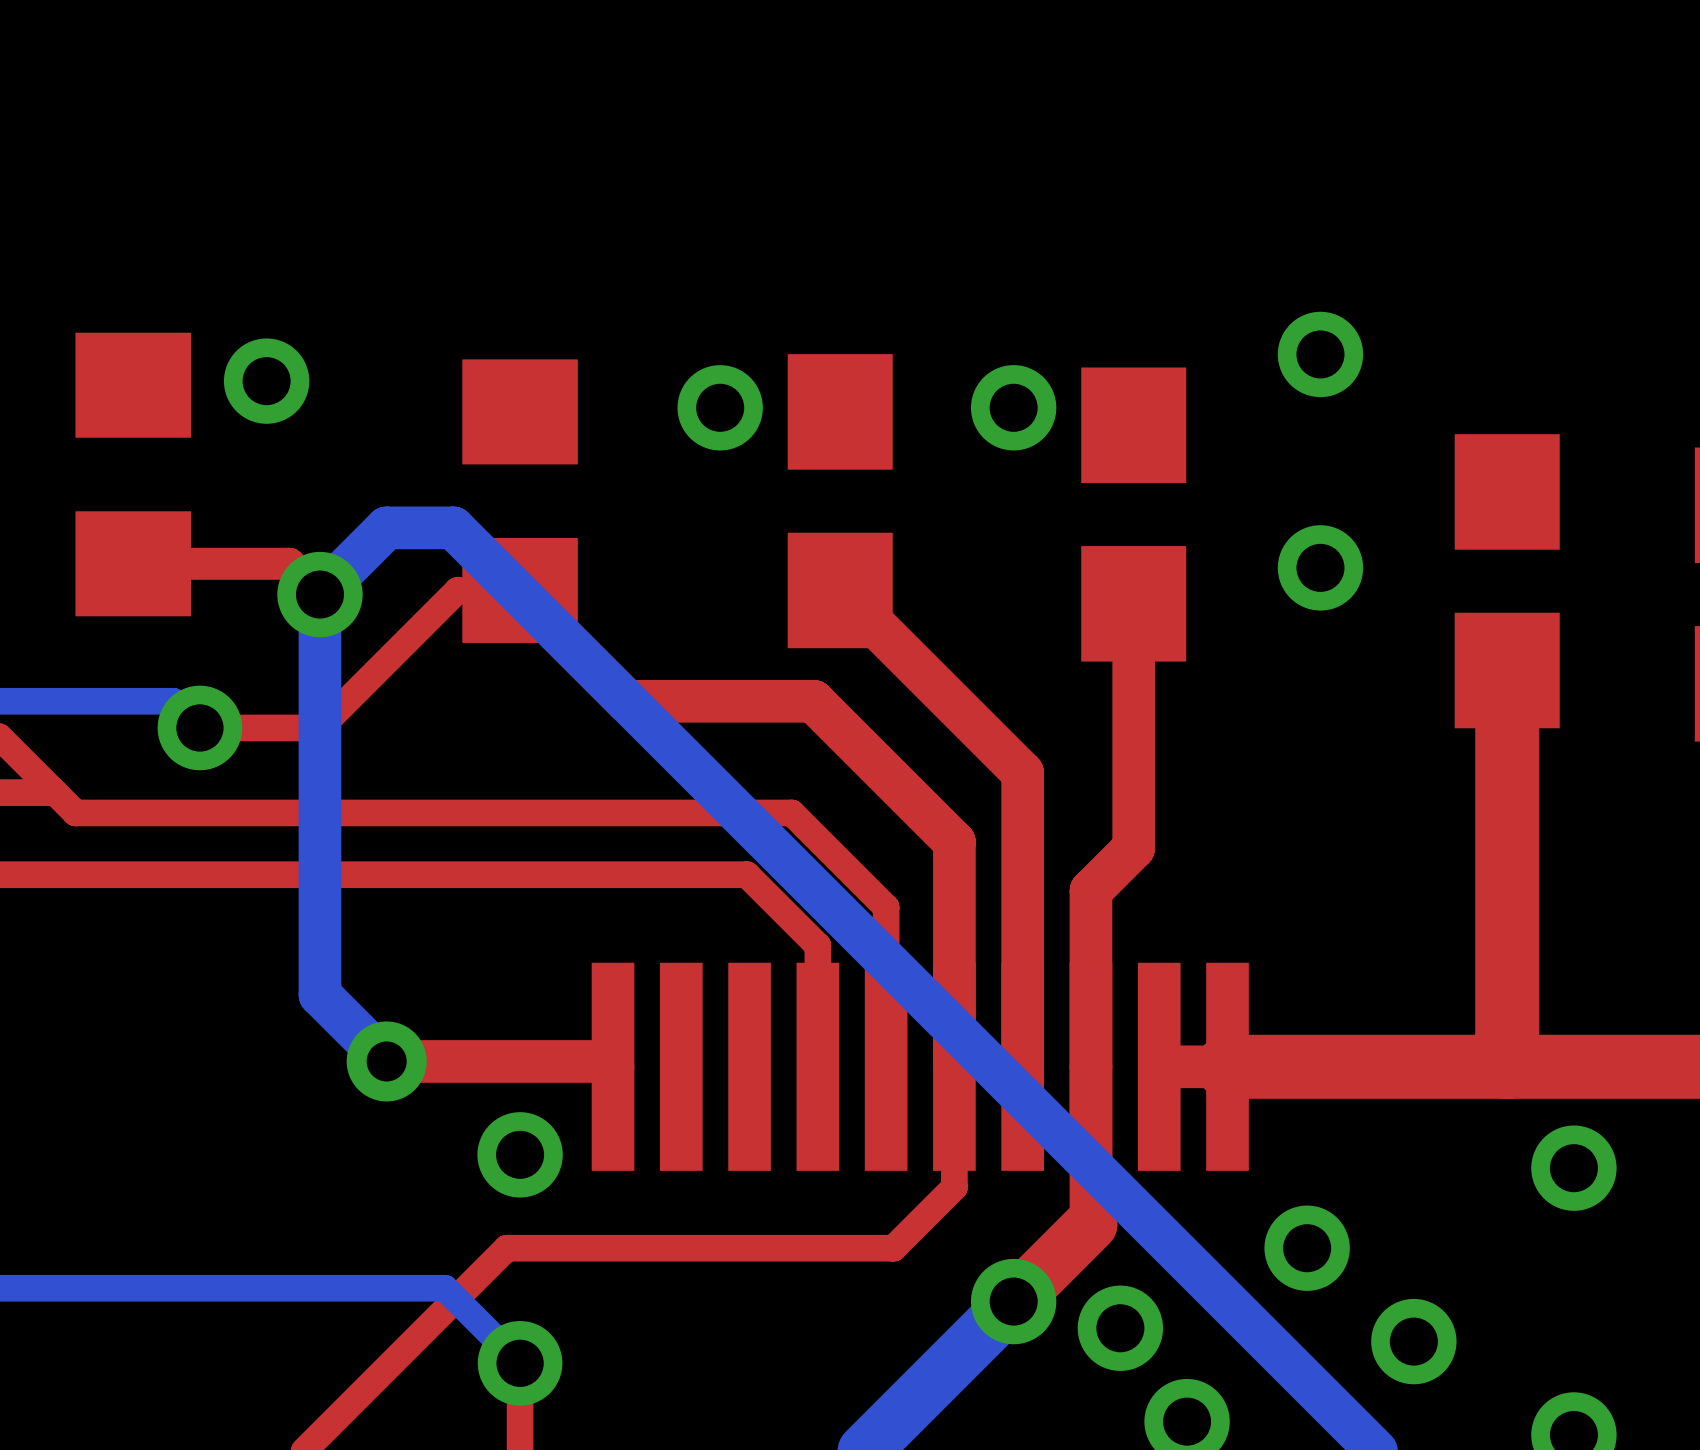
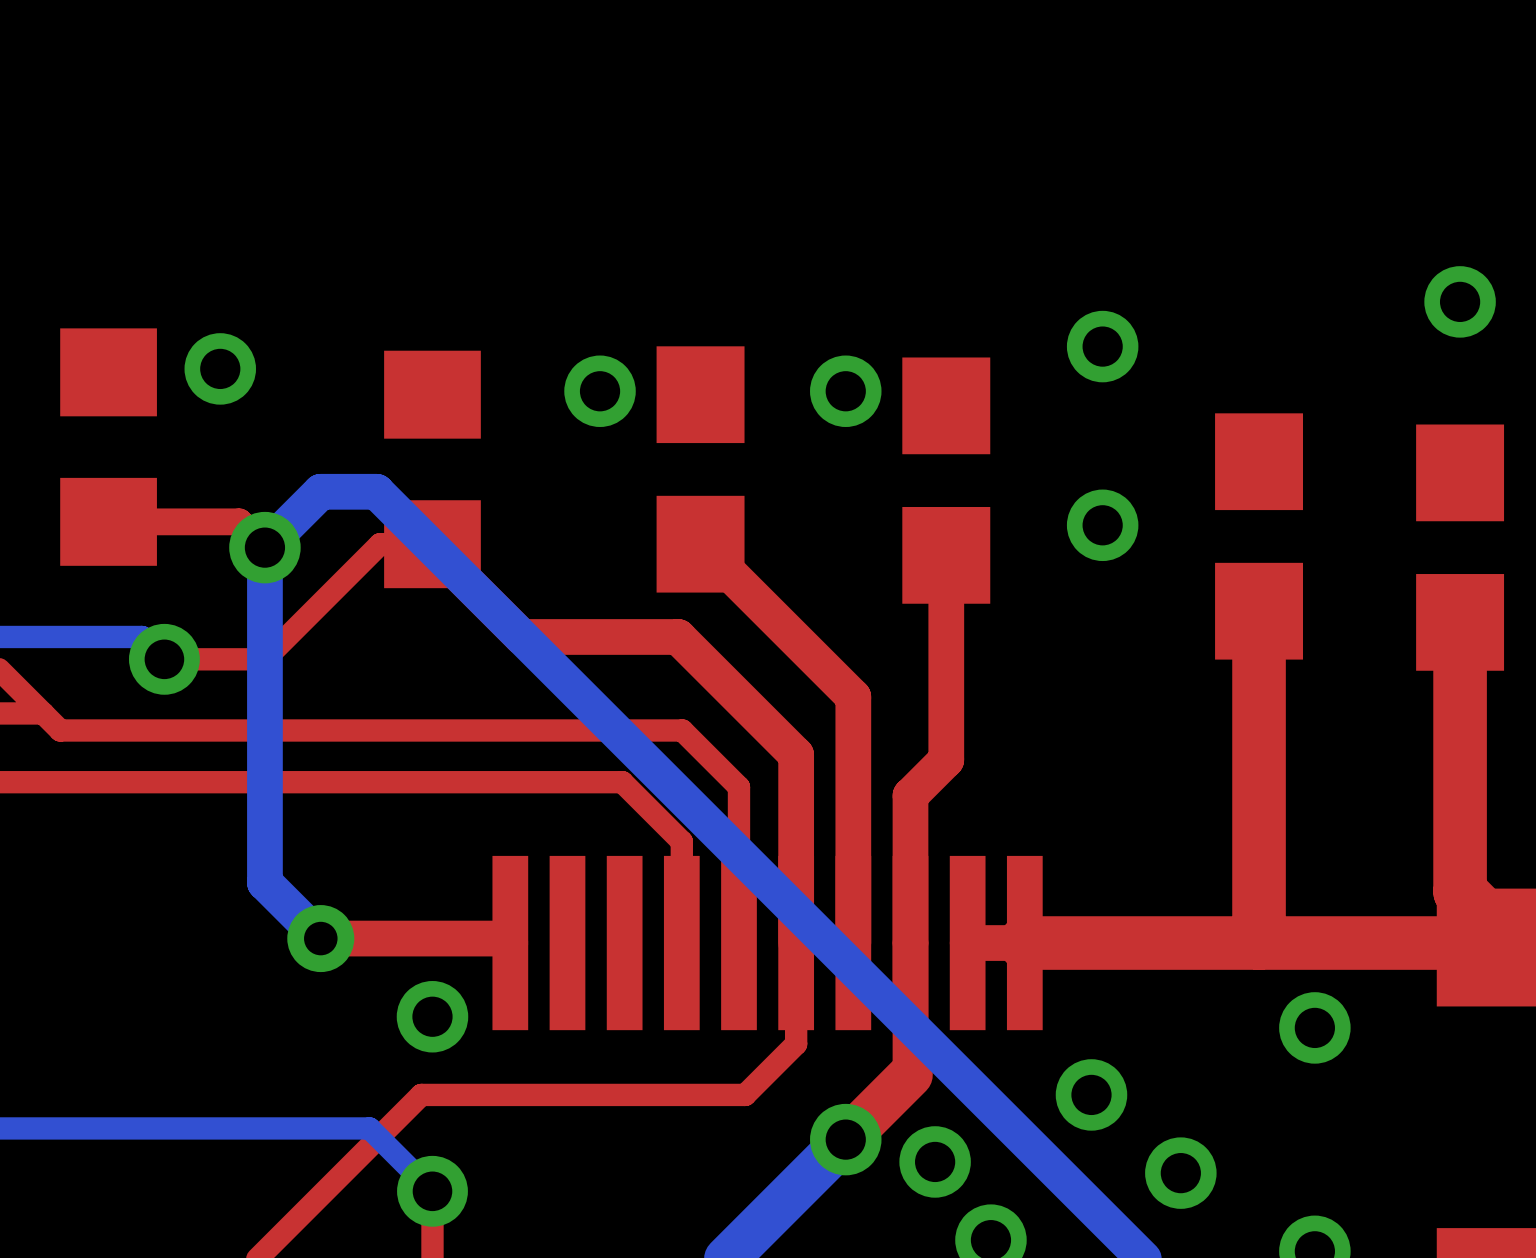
top track: (791, 812) (886, 907) -> (660, 730) (682, 730) (738, 787) (738, 809)

